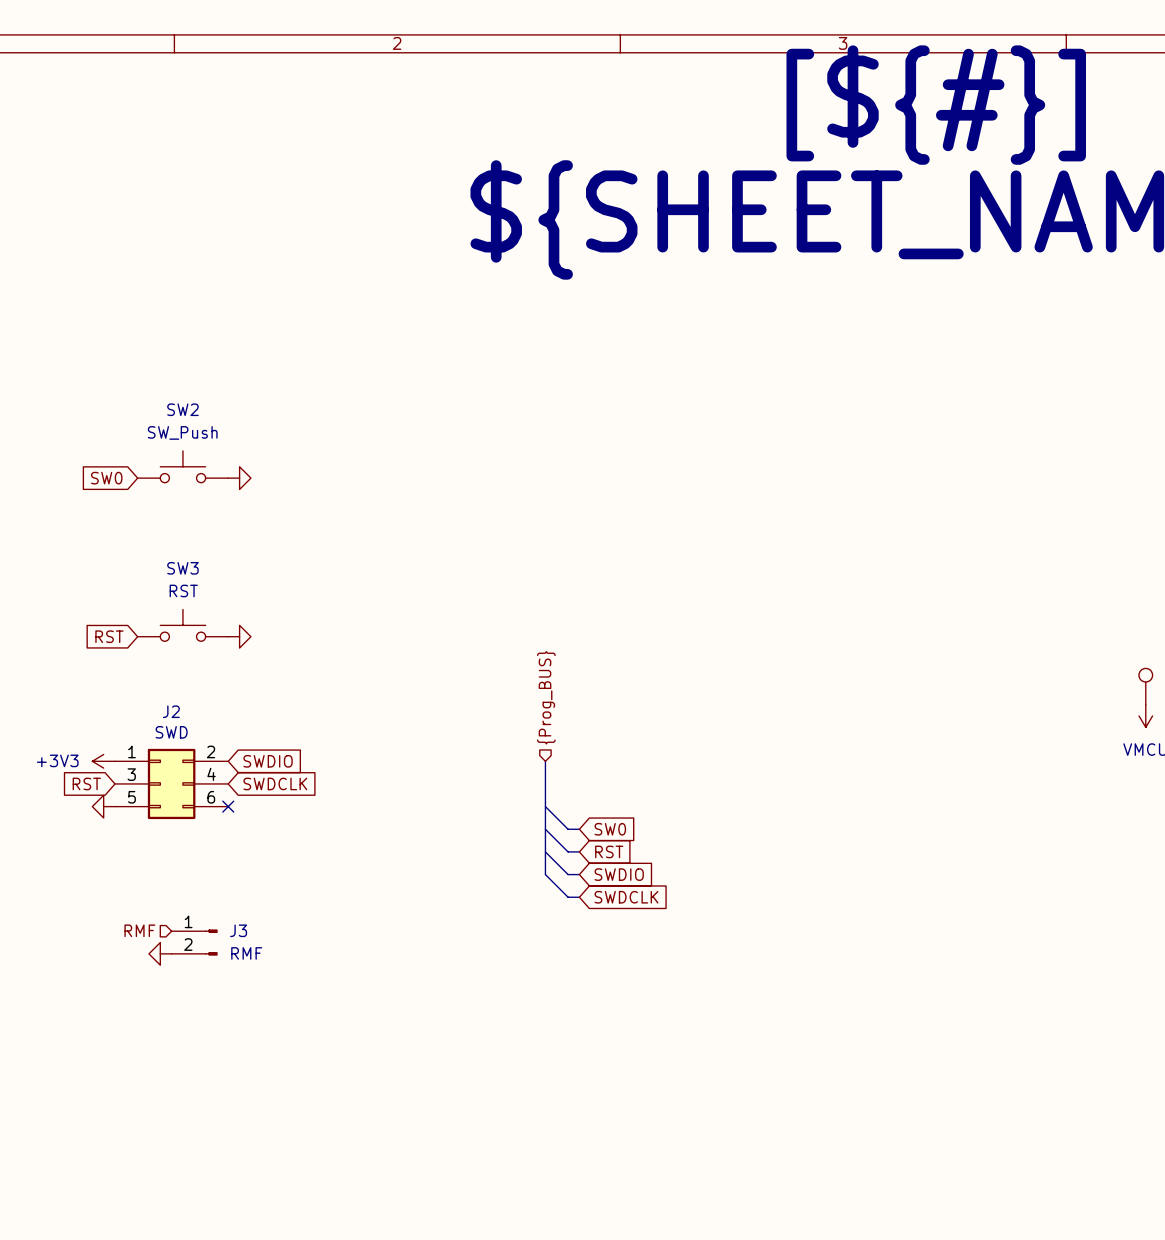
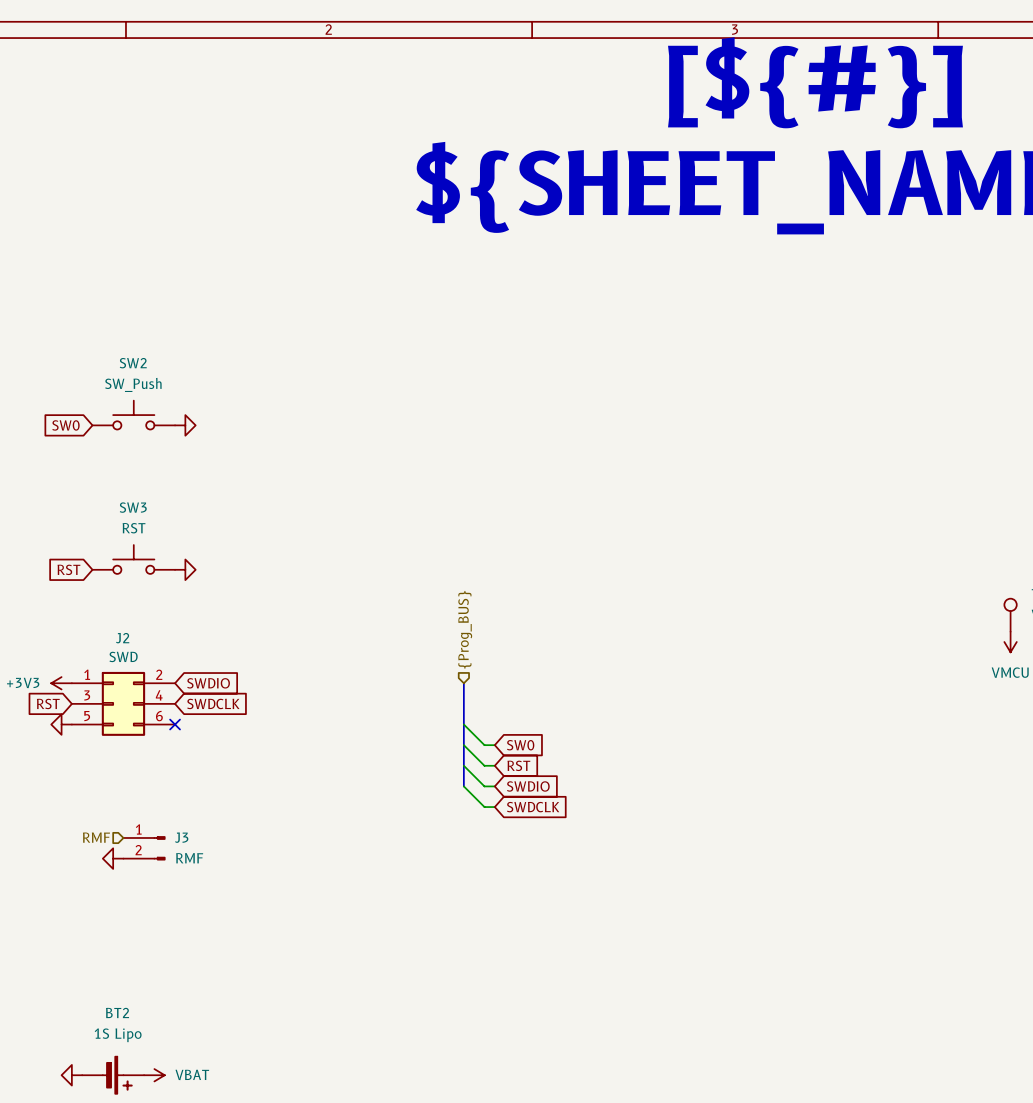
power symbol: none -> (71, 1075)
BT2: none -> 1S Lipo (113, 1075)
power symbol: none -> VBAT (154, 1075)

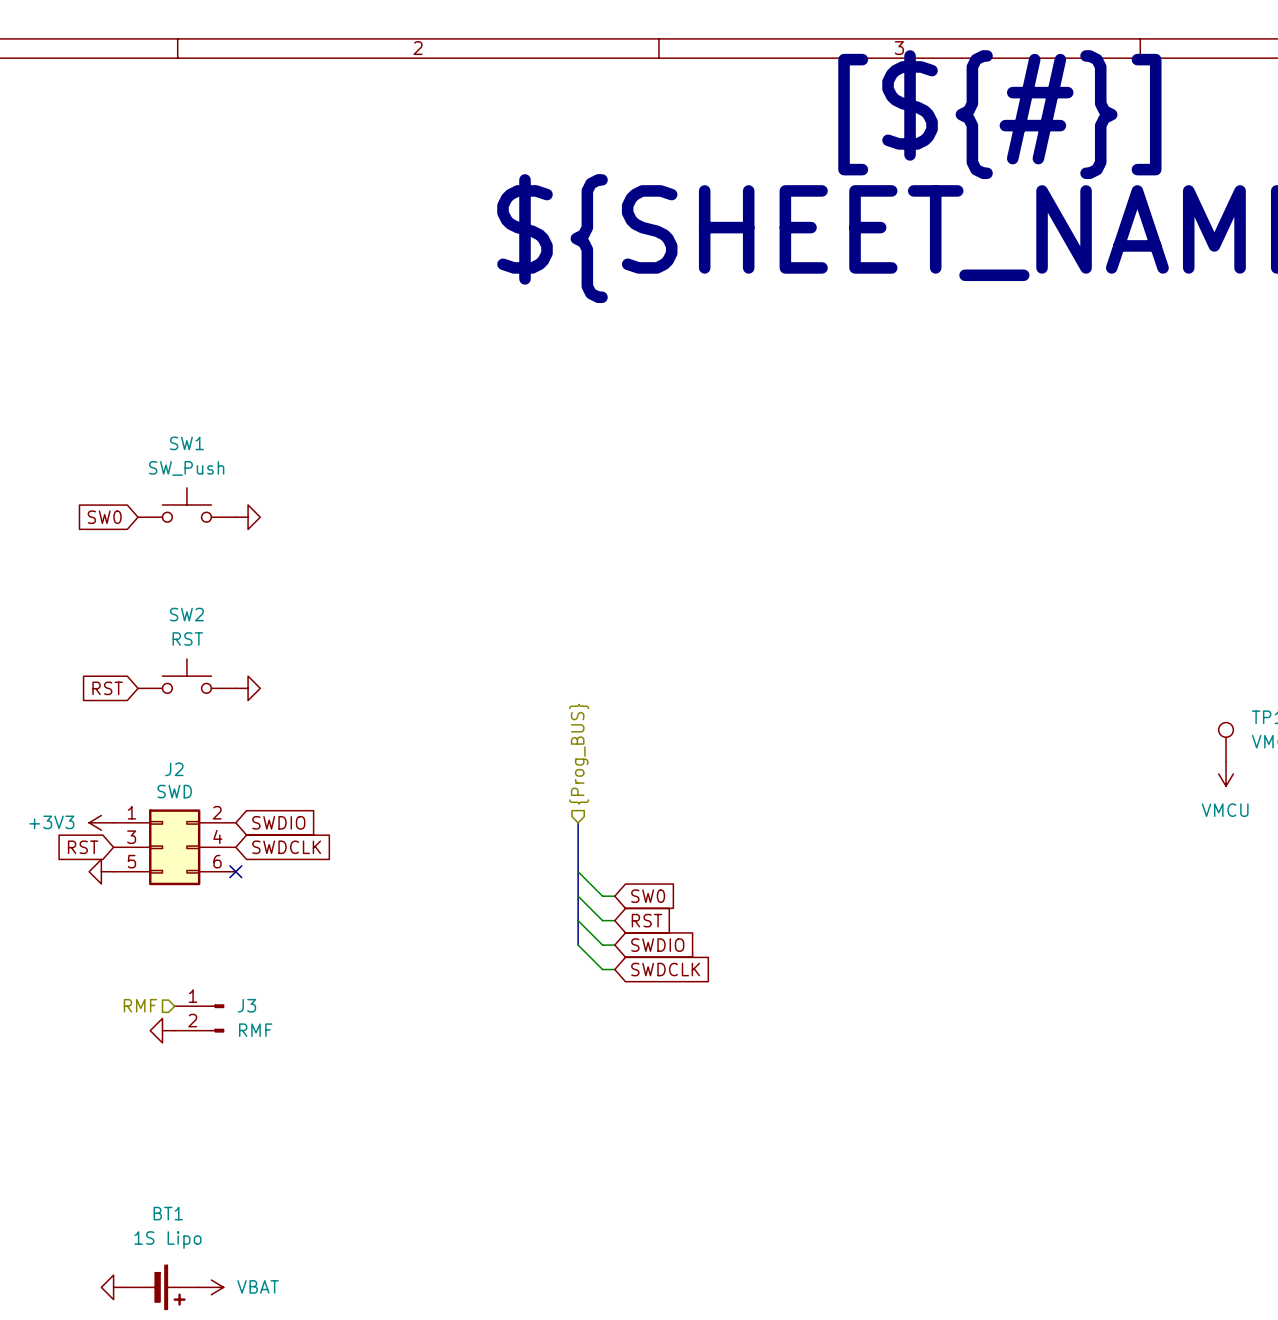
SW2 name: SW2 (133, 363) -> SW1 (186, 443)
SW3 name: SW3 (133, 507) -> SW2 (186, 614)
BT2 name: BT2 (117, 1012) -> BT1 (168, 1213)

